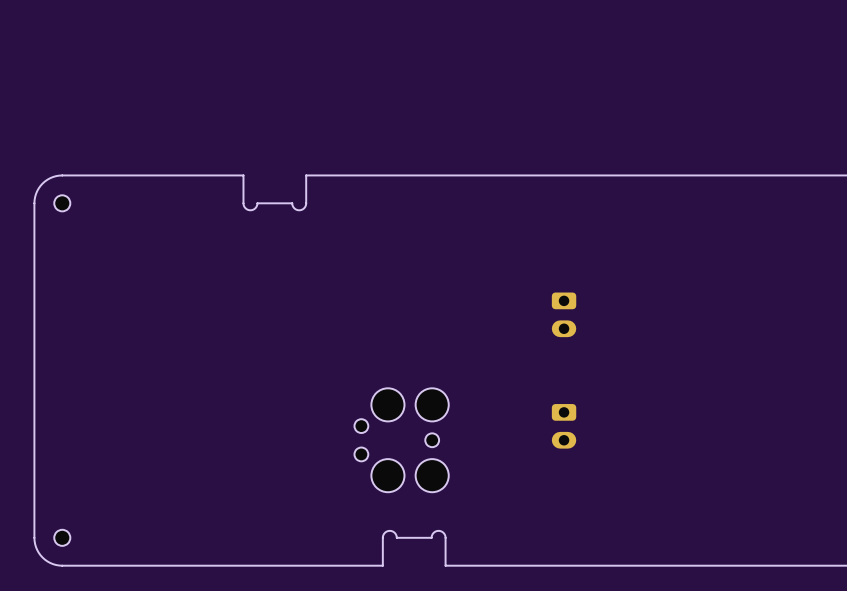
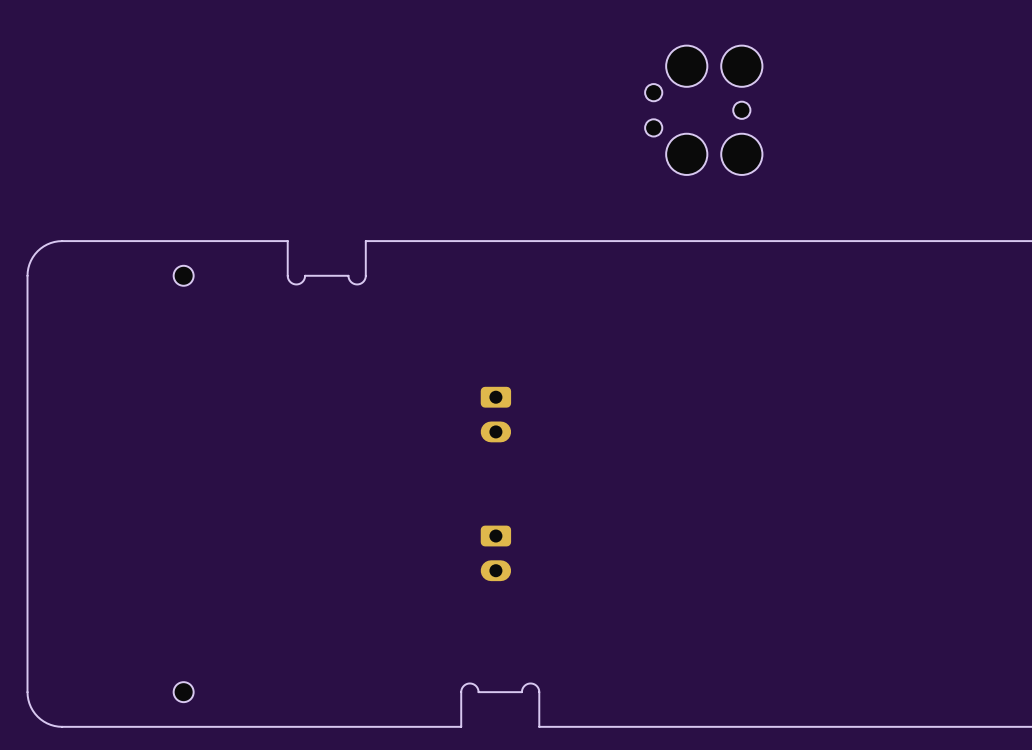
part: none -> (703, 110)
part position: (62, 203) -> (183, 275)
part: none -> (495, 414)
part: (564, 314) -> none
part: none -> (495, 553)
part: (564, 426) -> none
part: (401, 440) -> none
part position: (62, 537) -> (183, 692)

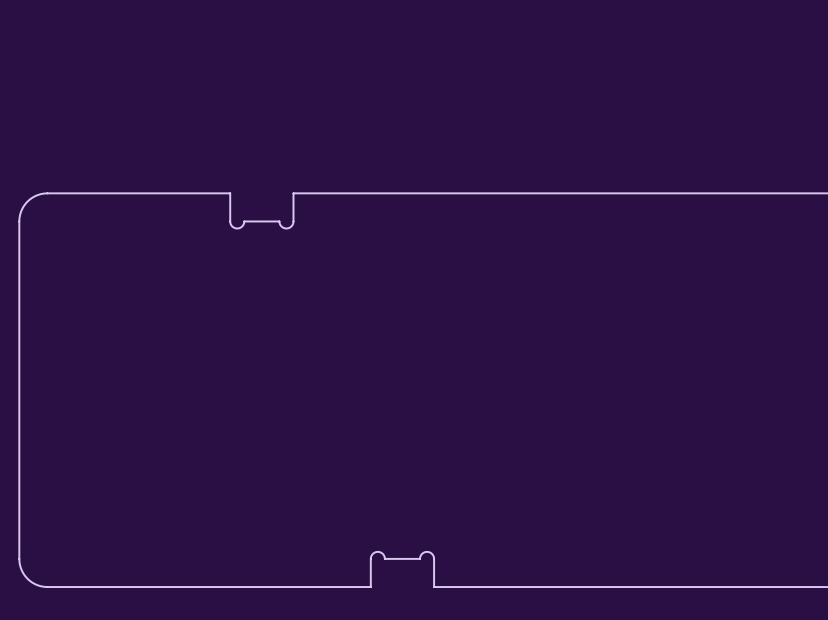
part: (703, 110) -> none
part: (183, 275) -> none
part: (495, 414) -> none
part: (495, 553) -> none
part: (183, 692) -> none

